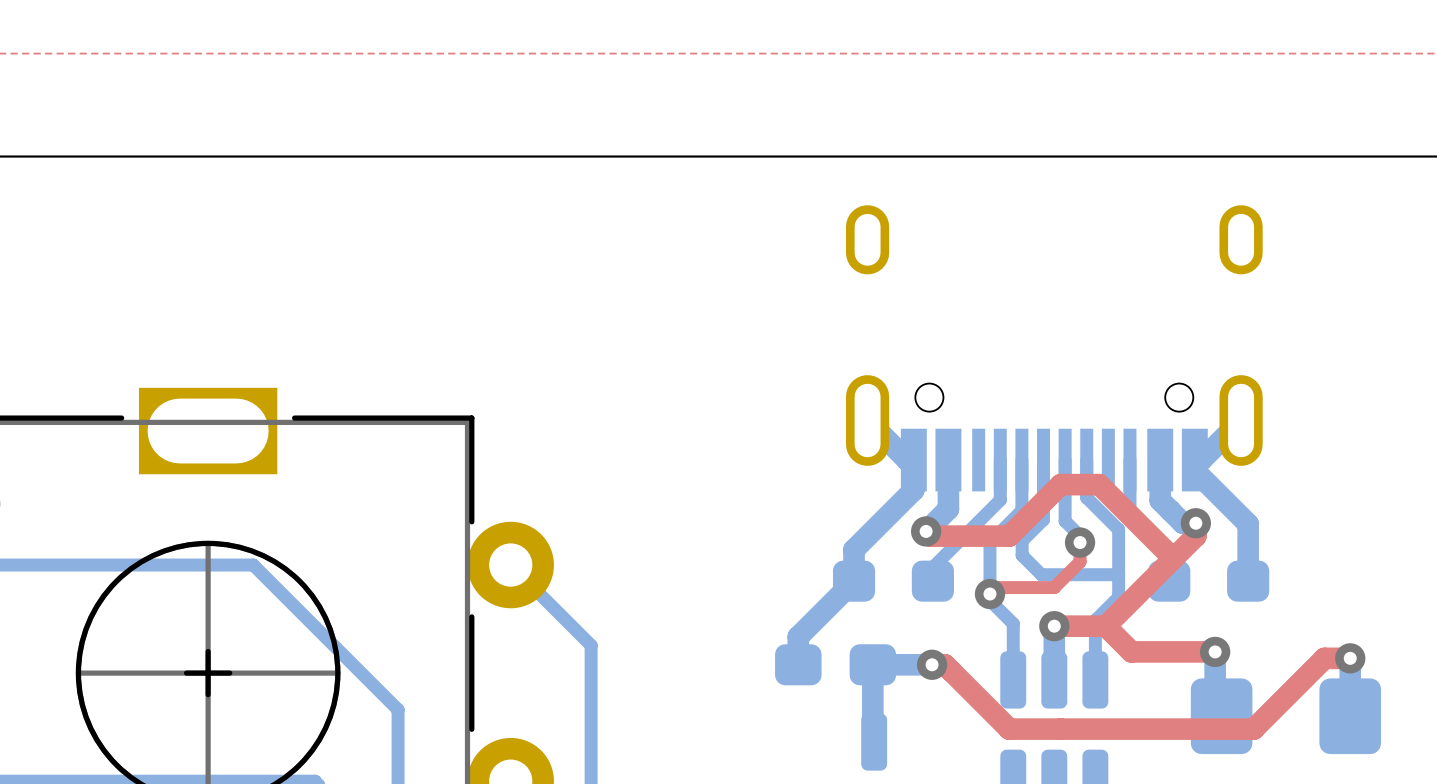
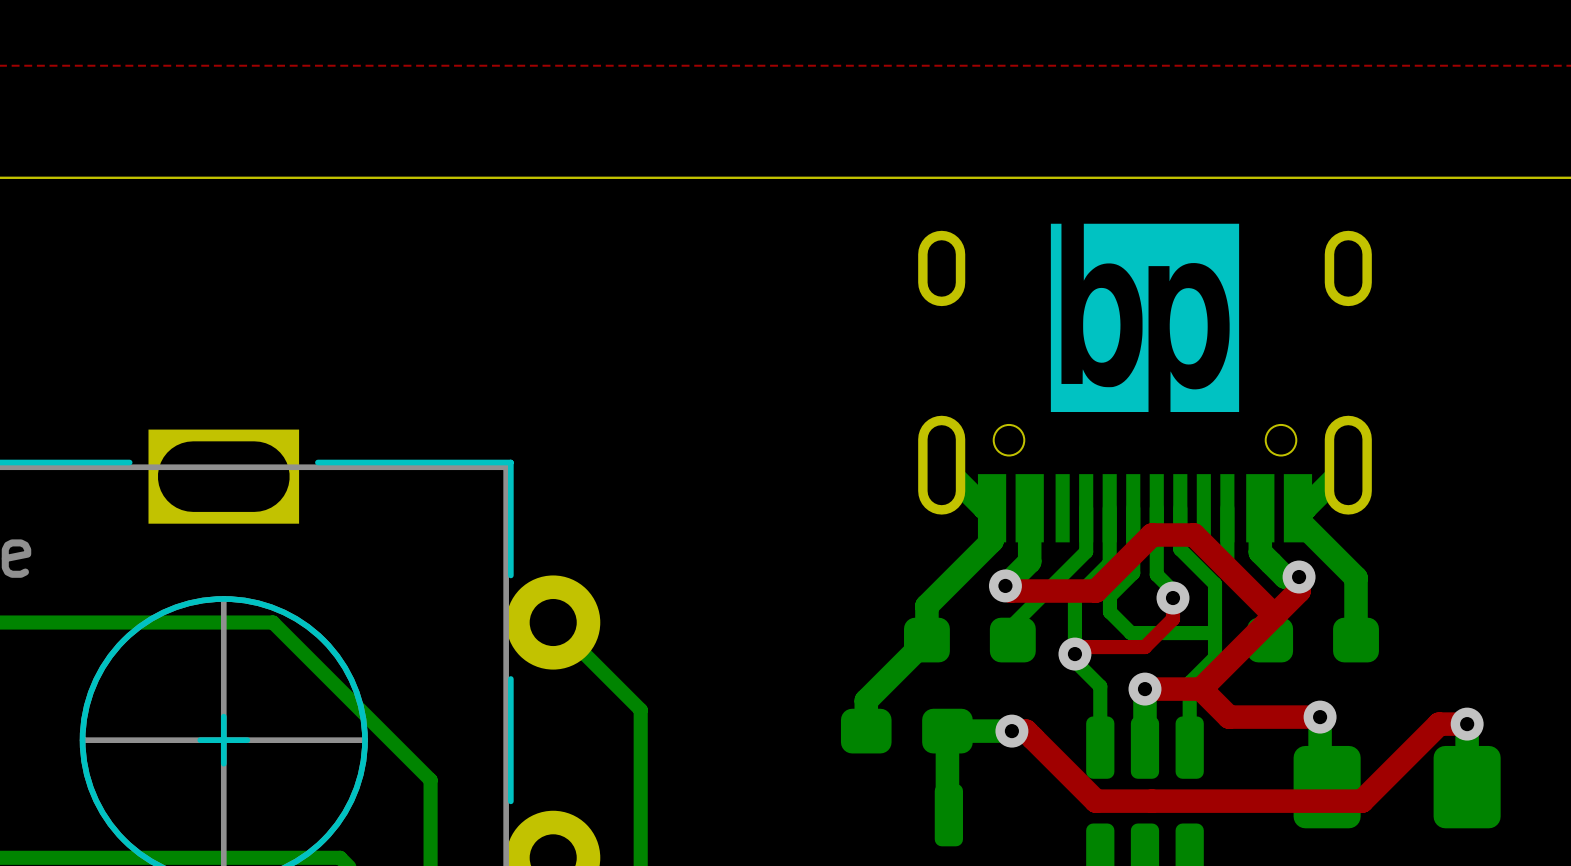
drawing: none -> [1050, 223, 1240, 412]

